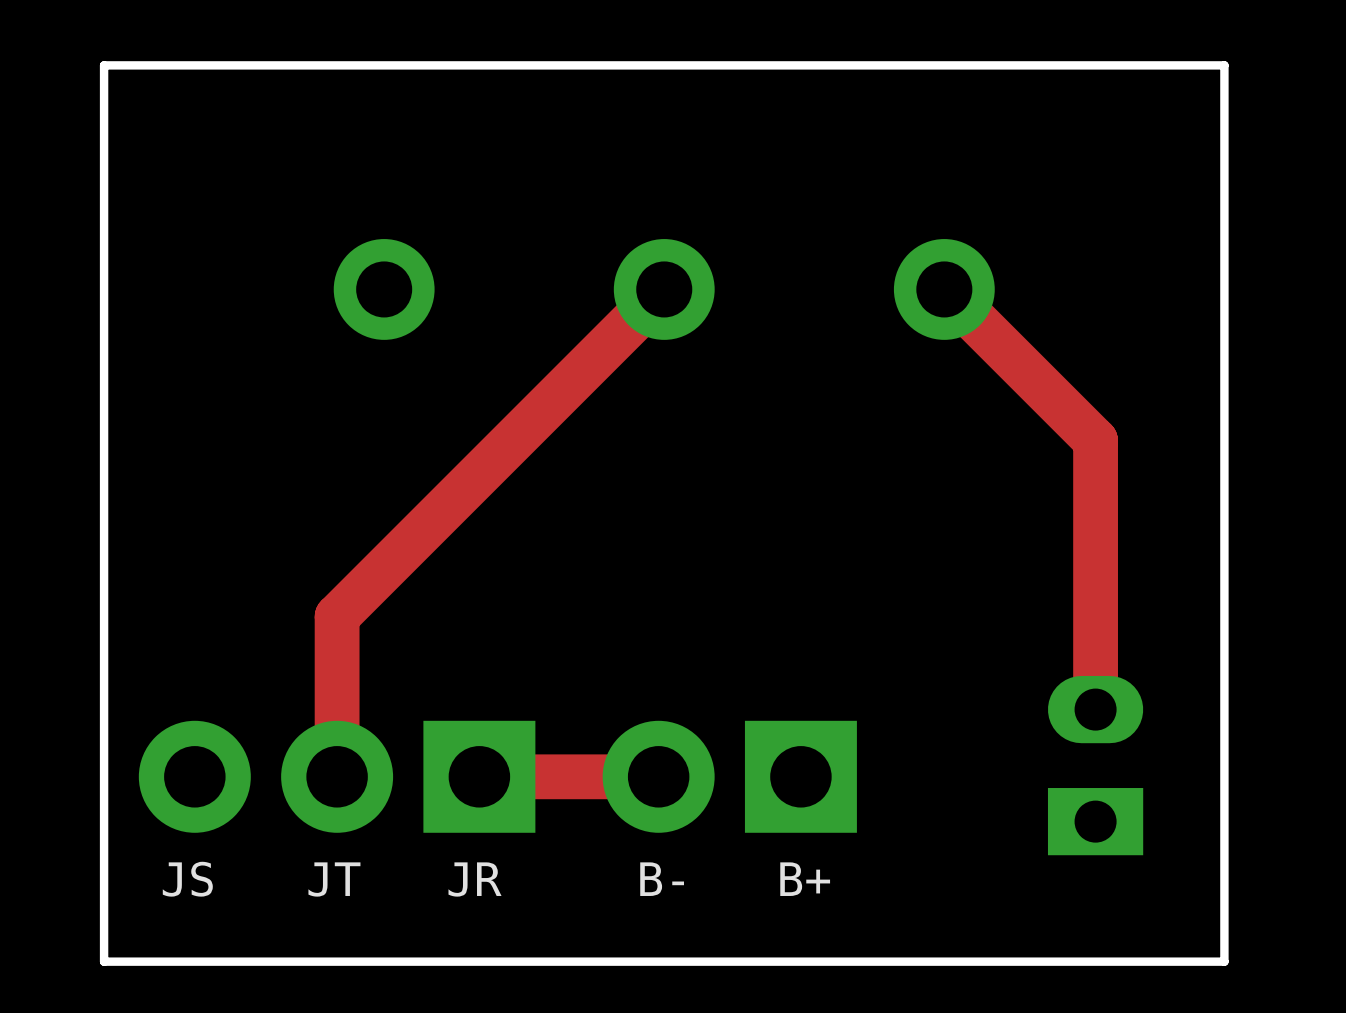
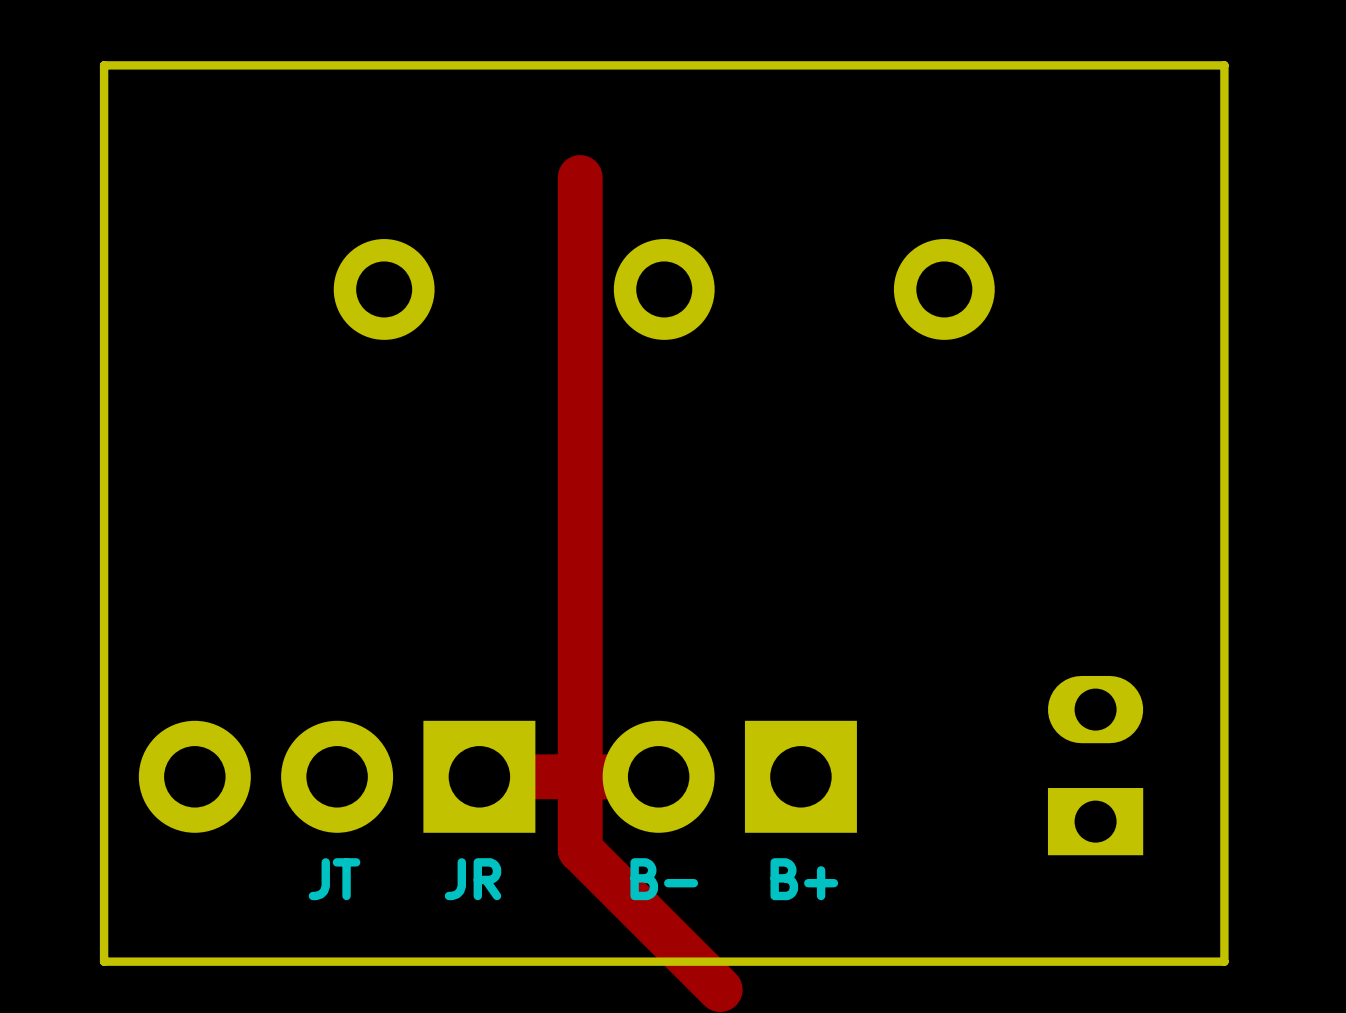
top track: none -> (580, 177) (580, 849) (720, 989)
top track: (664, 289) (337, 616) (337, 776) -> none
top track: (944, 289) (1095, 440) (1095, 709) -> none
text: JS (187, 879) -> none

